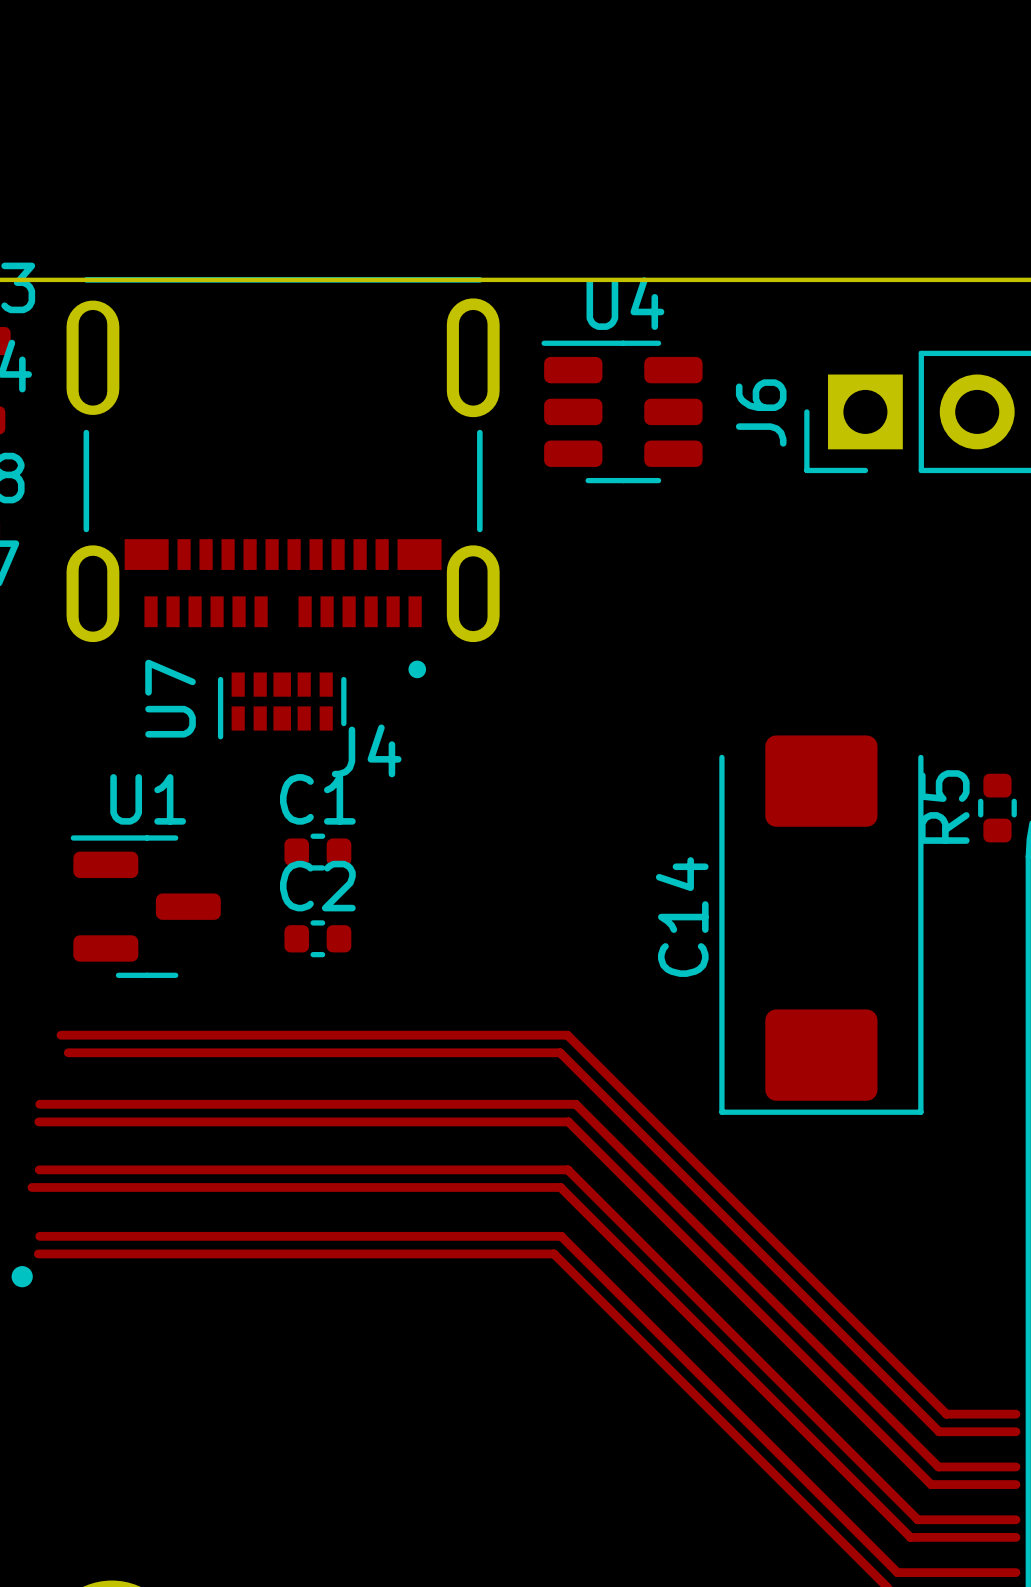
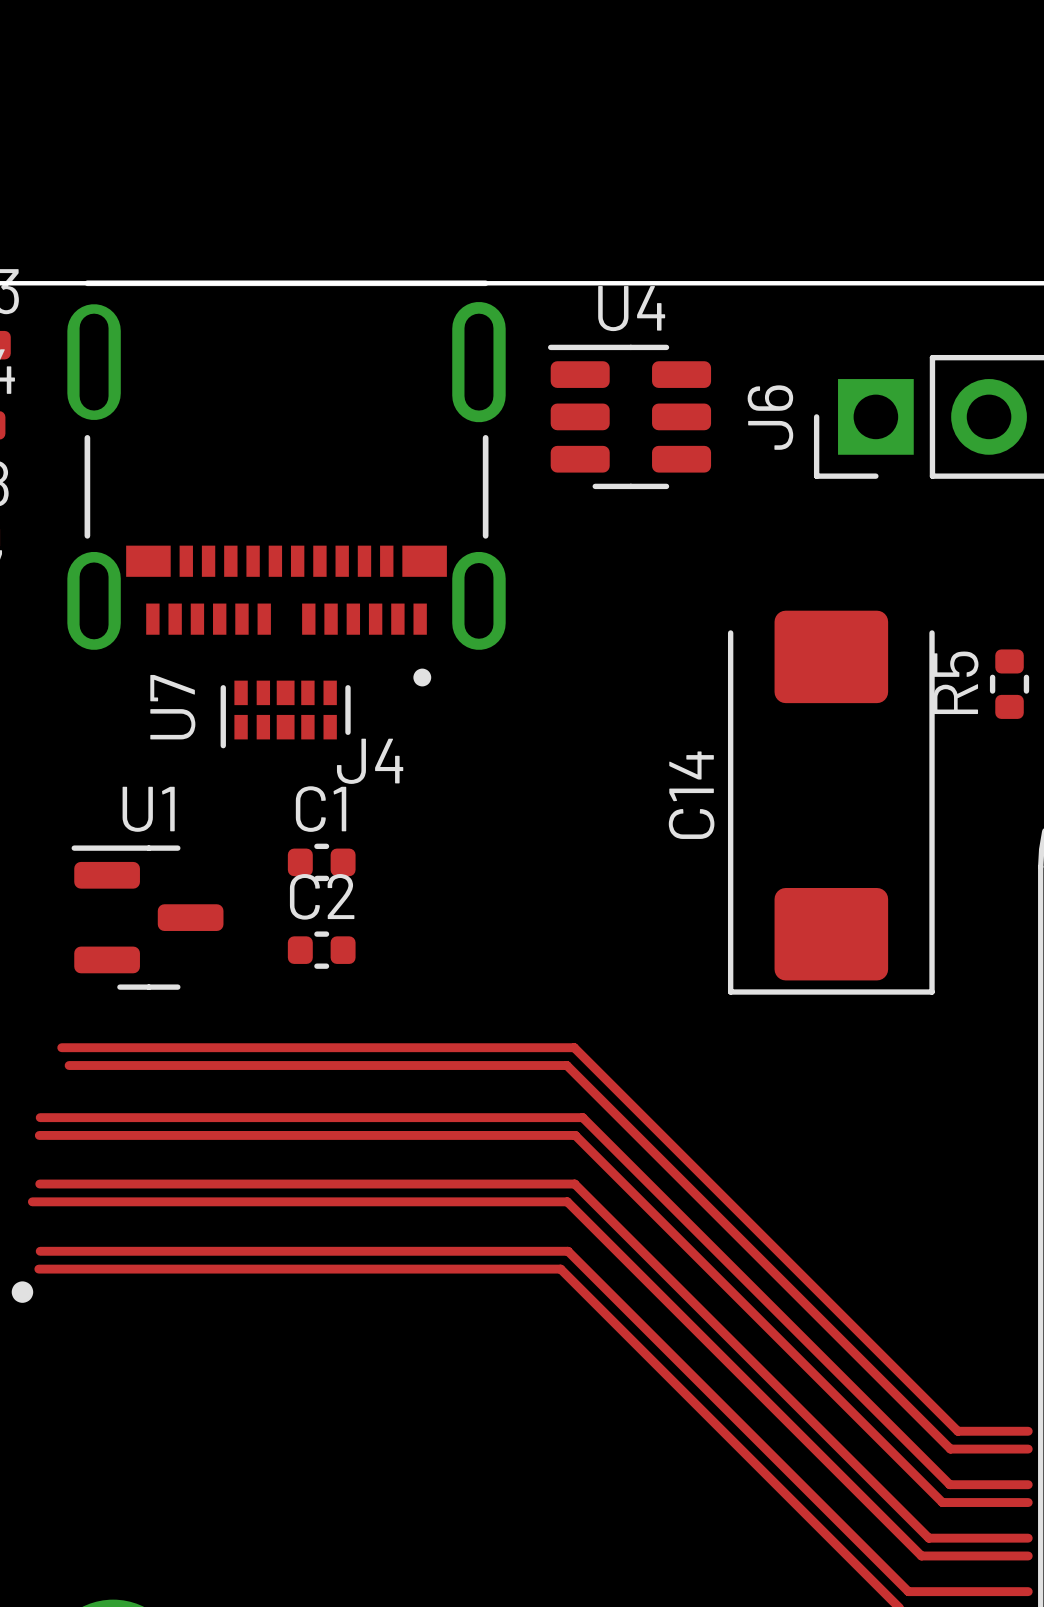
R5 position: (997, 808) -> (1009, 684)
C14 position: (821, 925) -> (831, 802)

